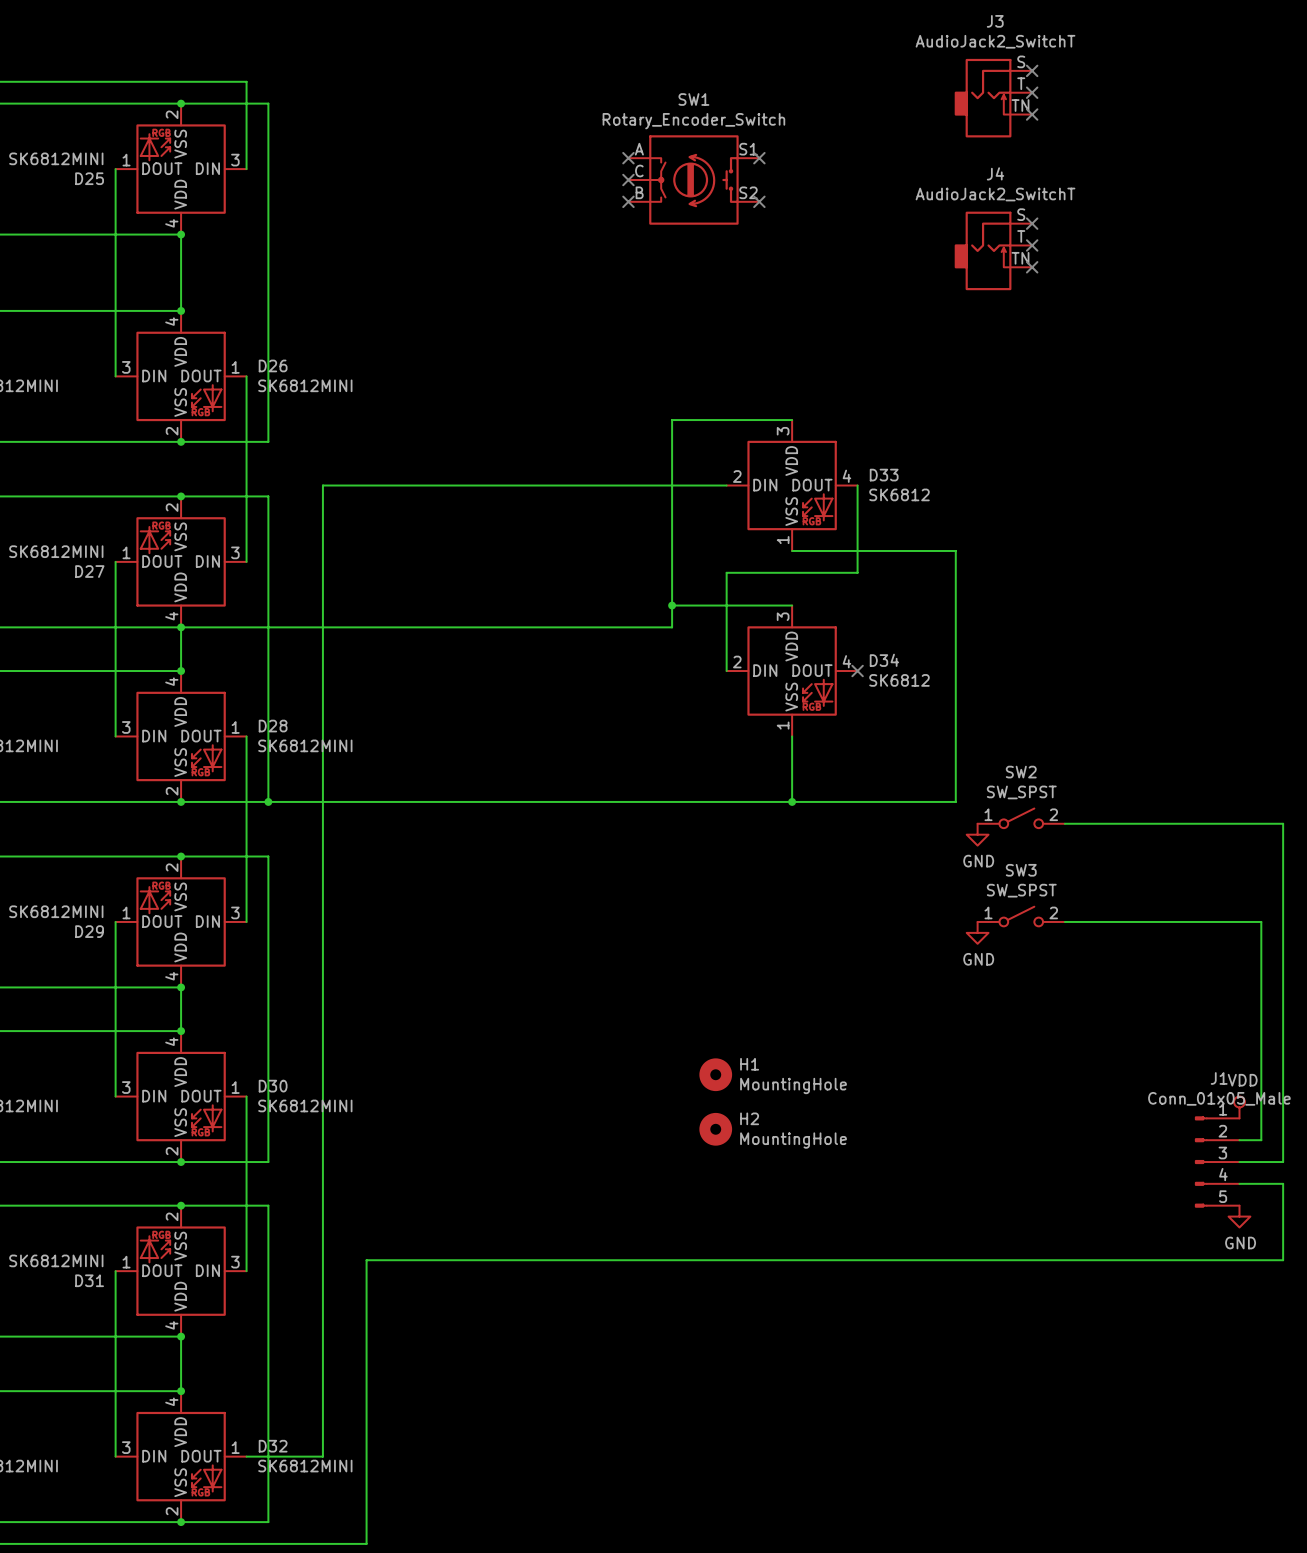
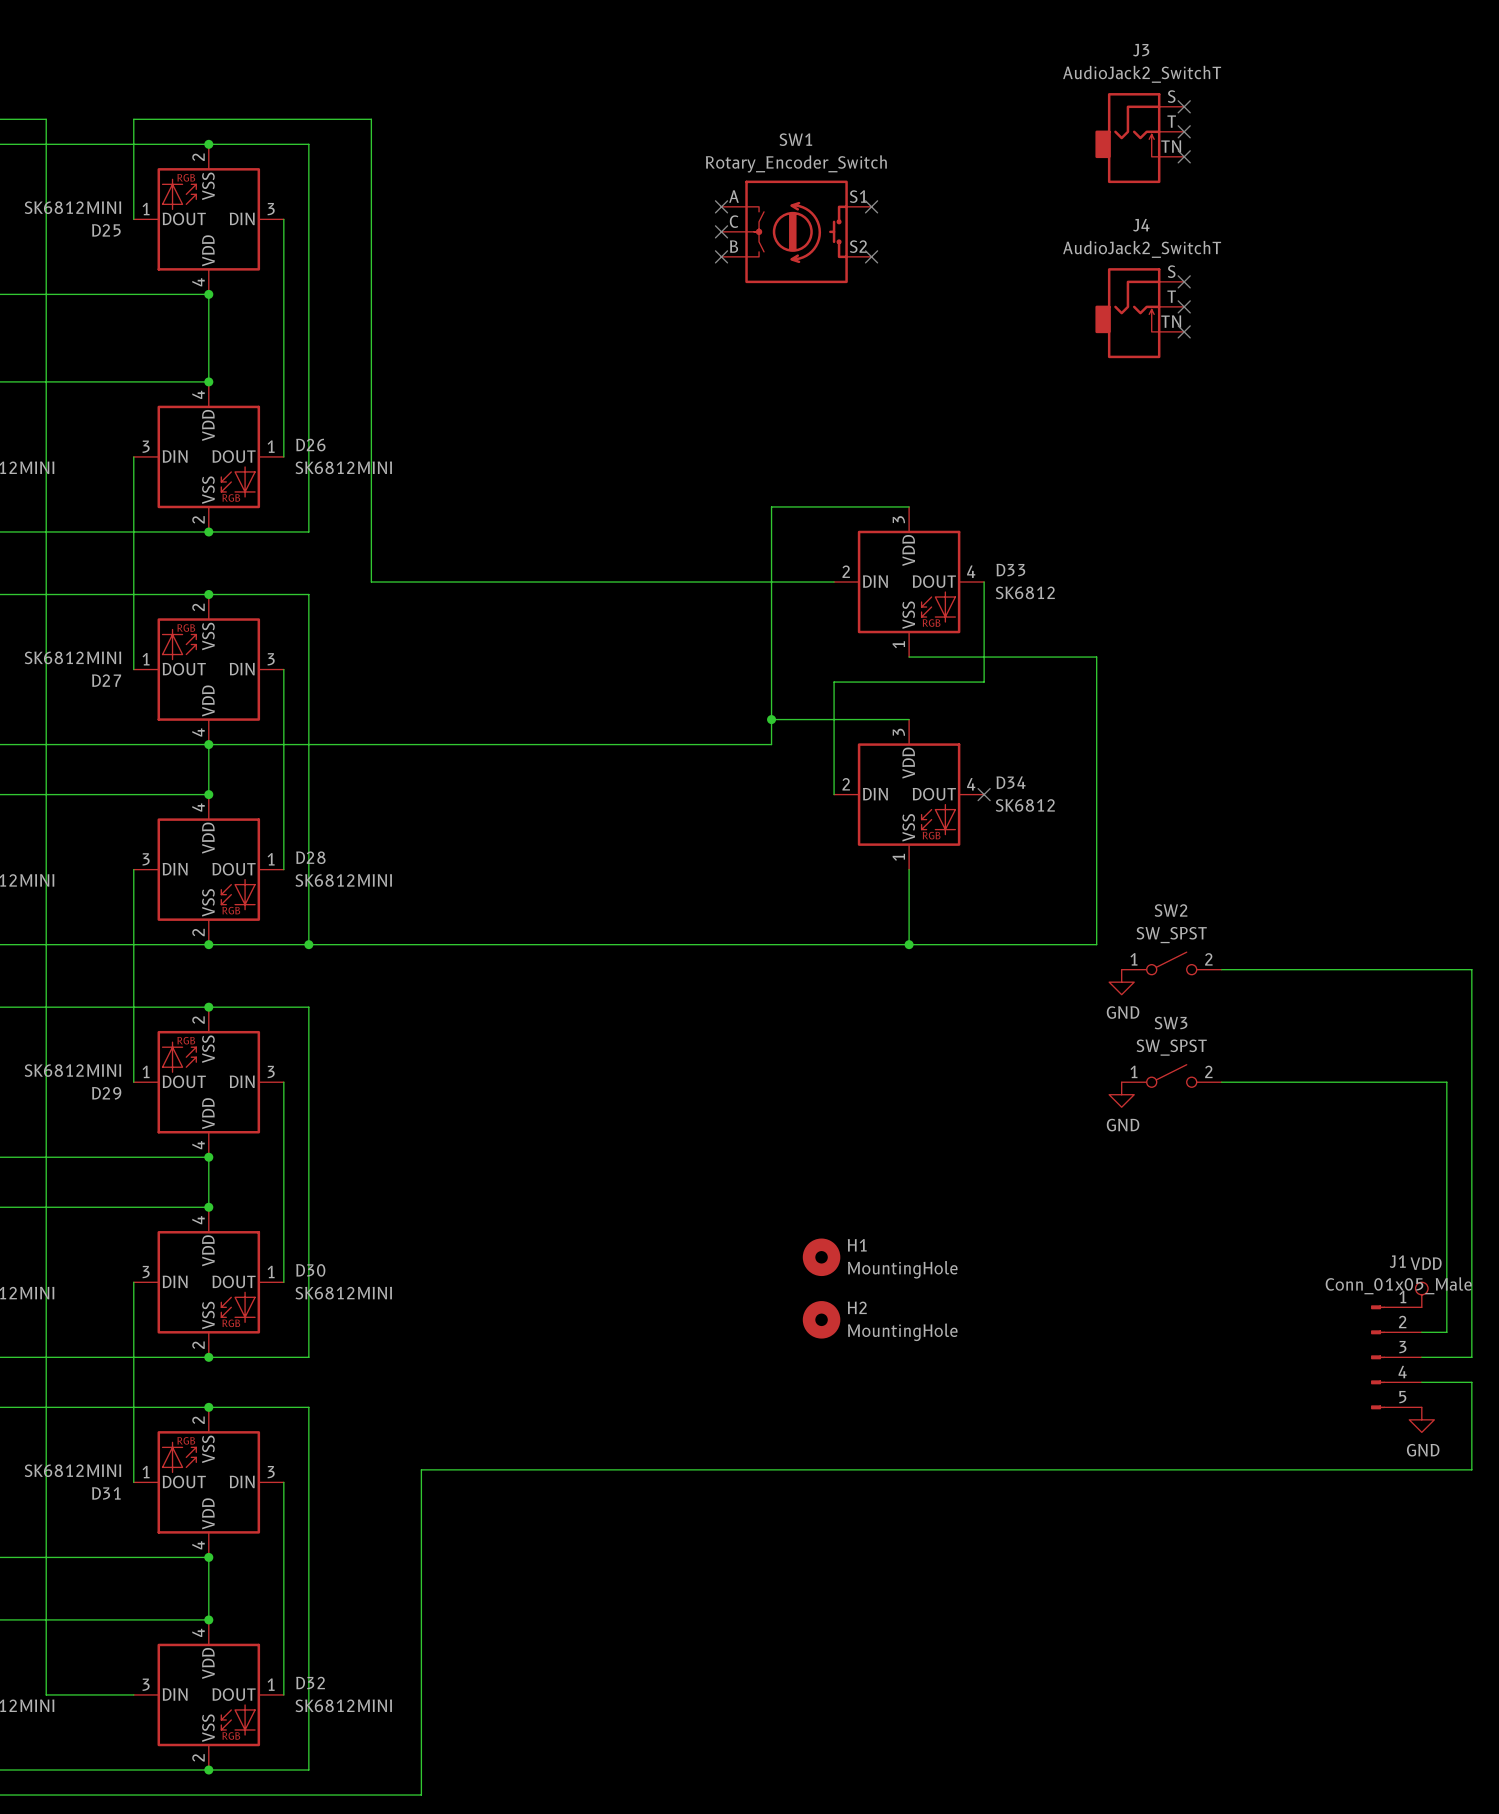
wire: (39, 81) (115, 81) -> (133, 219) (133, 119)
wire: (246, 81) (246, 169) -> (283, 456) (283, 219)
wire: none -> (283, 119) (371, 119) (371, 582)
wire: (115, 169) (115, 376) -> none
wire: (246, 376) (246, 561) -> (283, 869) (283, 669)
wire: (322, 485) (322, 1456) (246, 1456) -> (283, 1482) (283, 1694)
wire: (115, 561) (115, 736) -> (133, 669) (133, 456)
wire: (246, 736) (246, 921) -> (133, 869) (133, 1082)
wire: (115, 921) (115, 1096) -> (133, 1482) (133, 1282)
wire: (246, 1096) (246, 1271) -> (283, 1282) (283, 1082)
wire: (115, 1271) (115, 1456) -> (46, 119) (46, 1694) (133, 1694)

